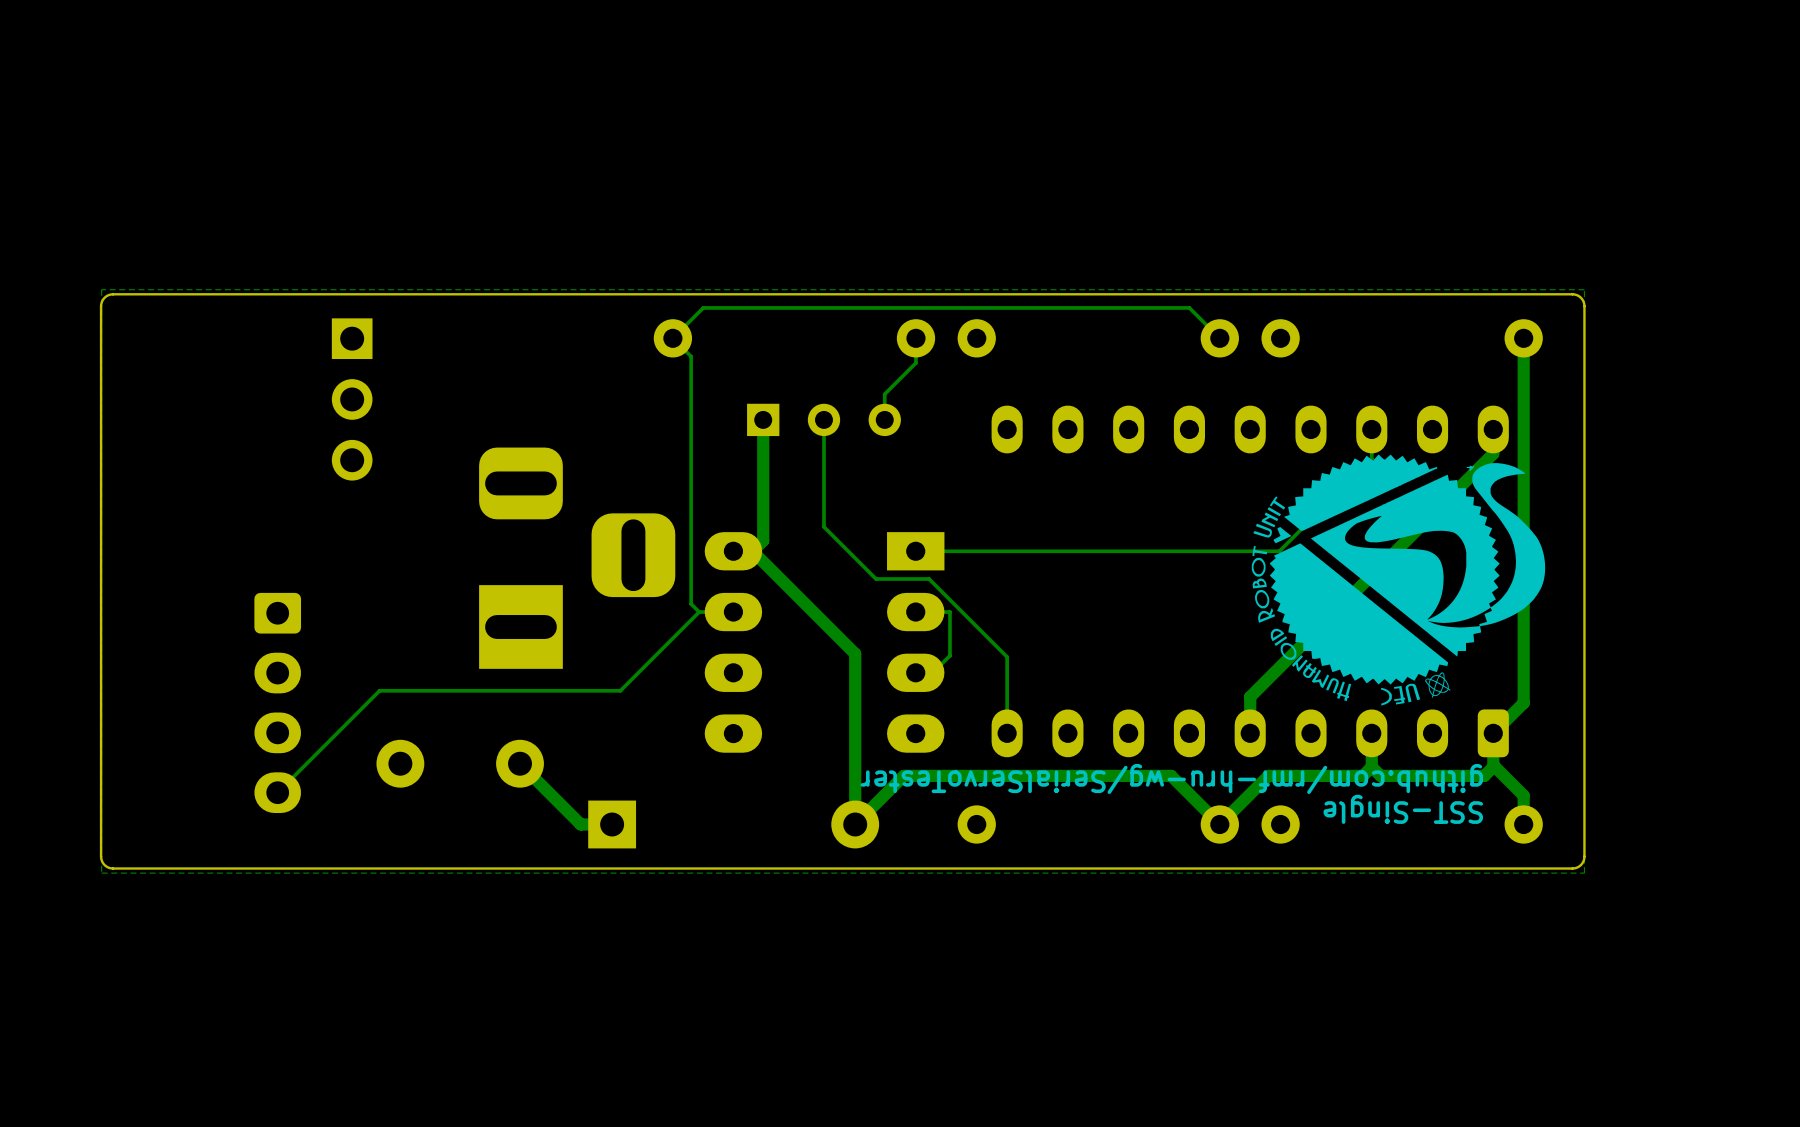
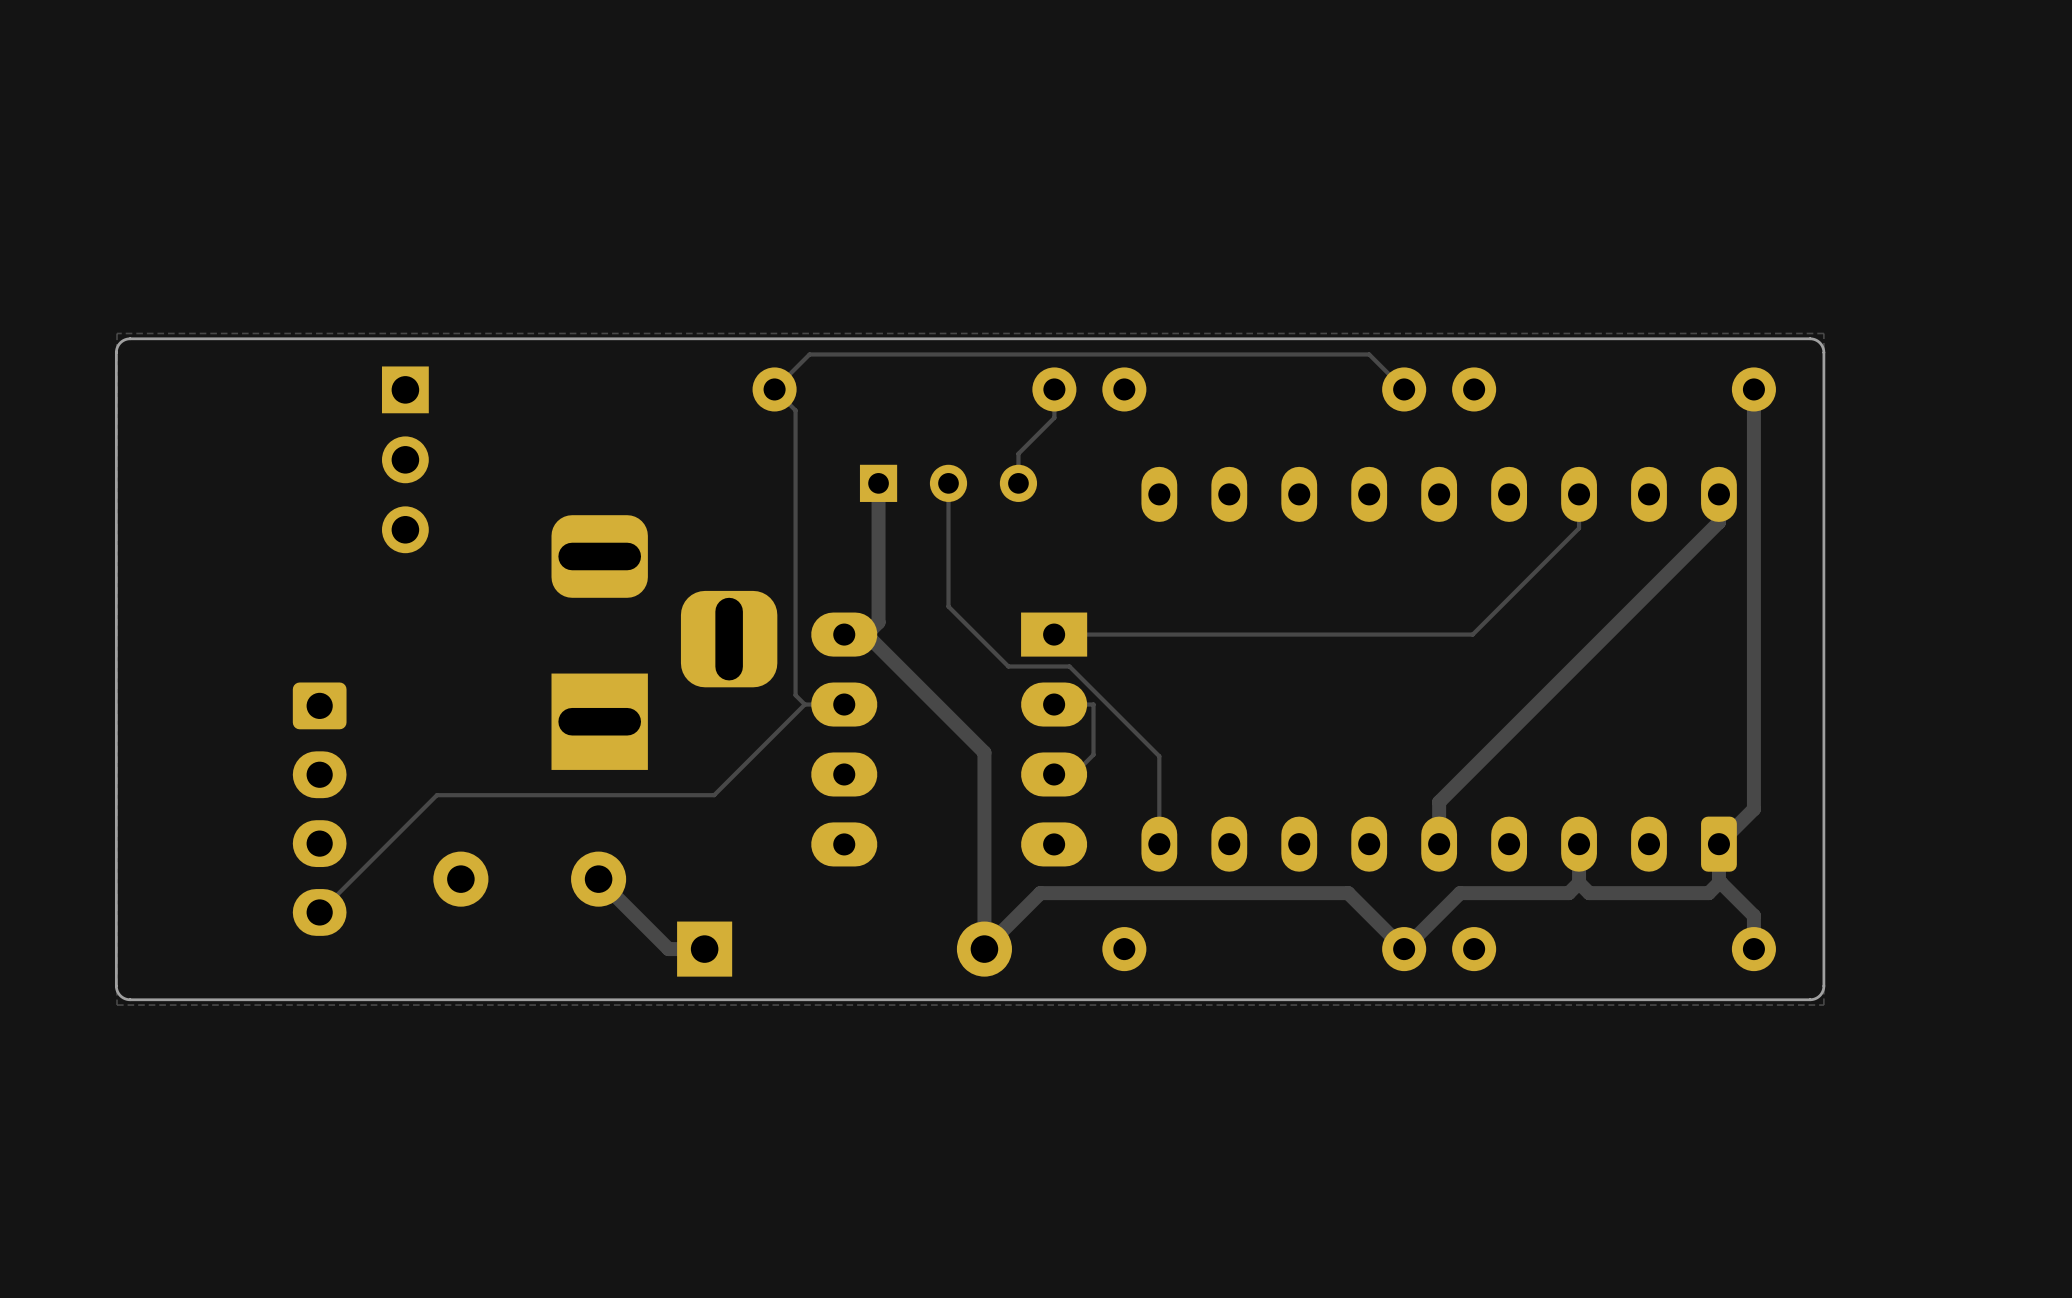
drawing: [1251, 454, 1546, 706] -> none
text: github.com/rmf-hru-wg/SerialServoTester (1171, 778) -> none
text: SST-Single (1403, 809) -> none

